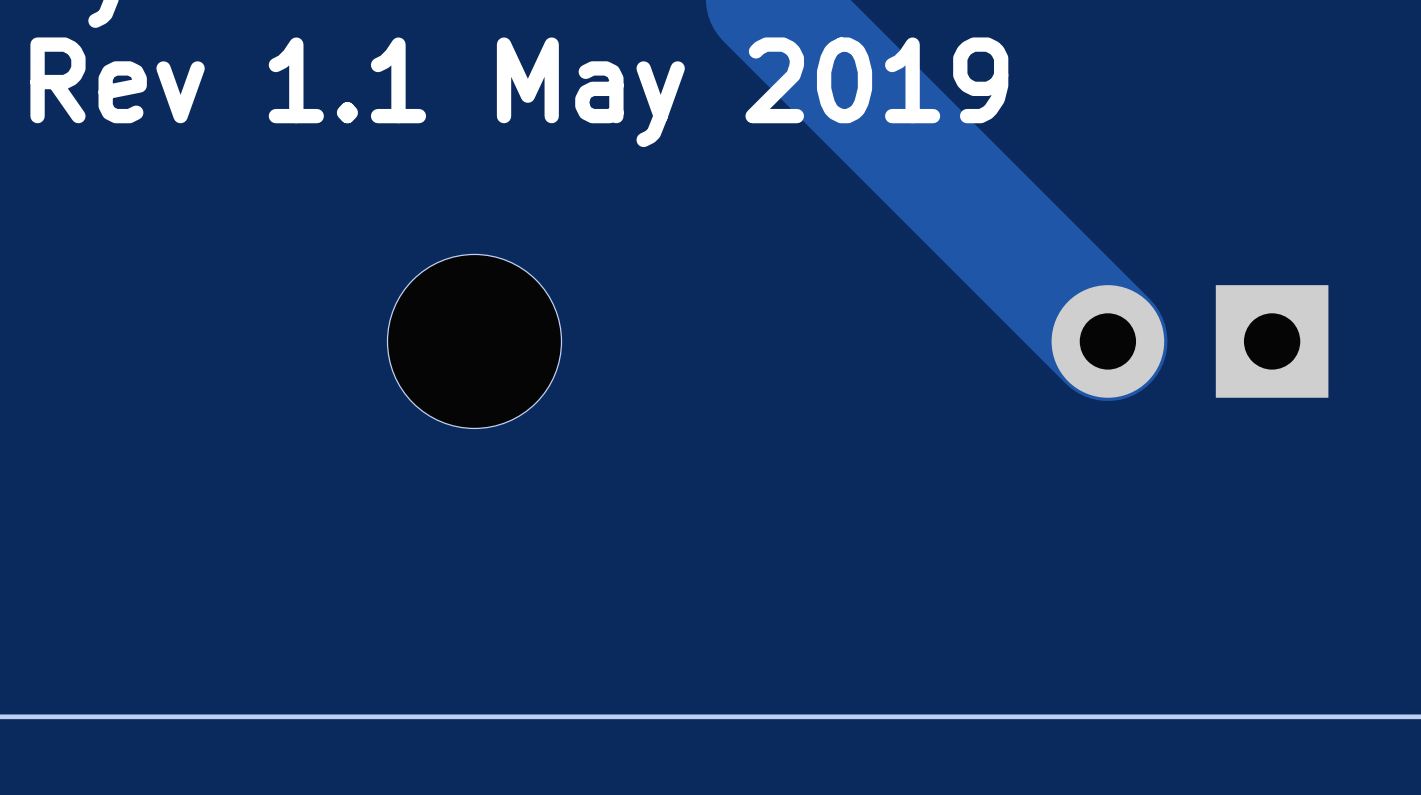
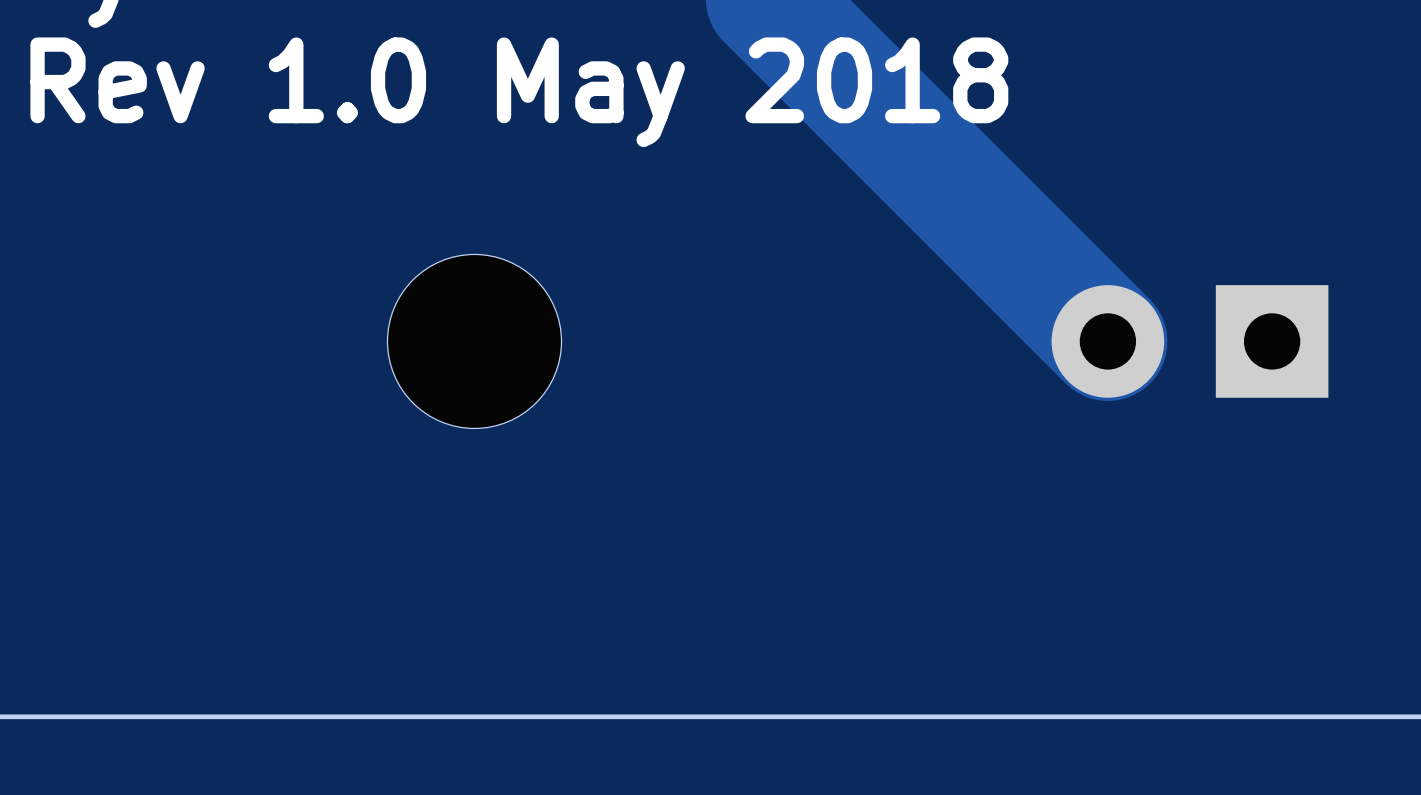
text: Rev 1.1 May 2019 (519, 92) -> Rev 1.0 May 2018 (519, 92)

